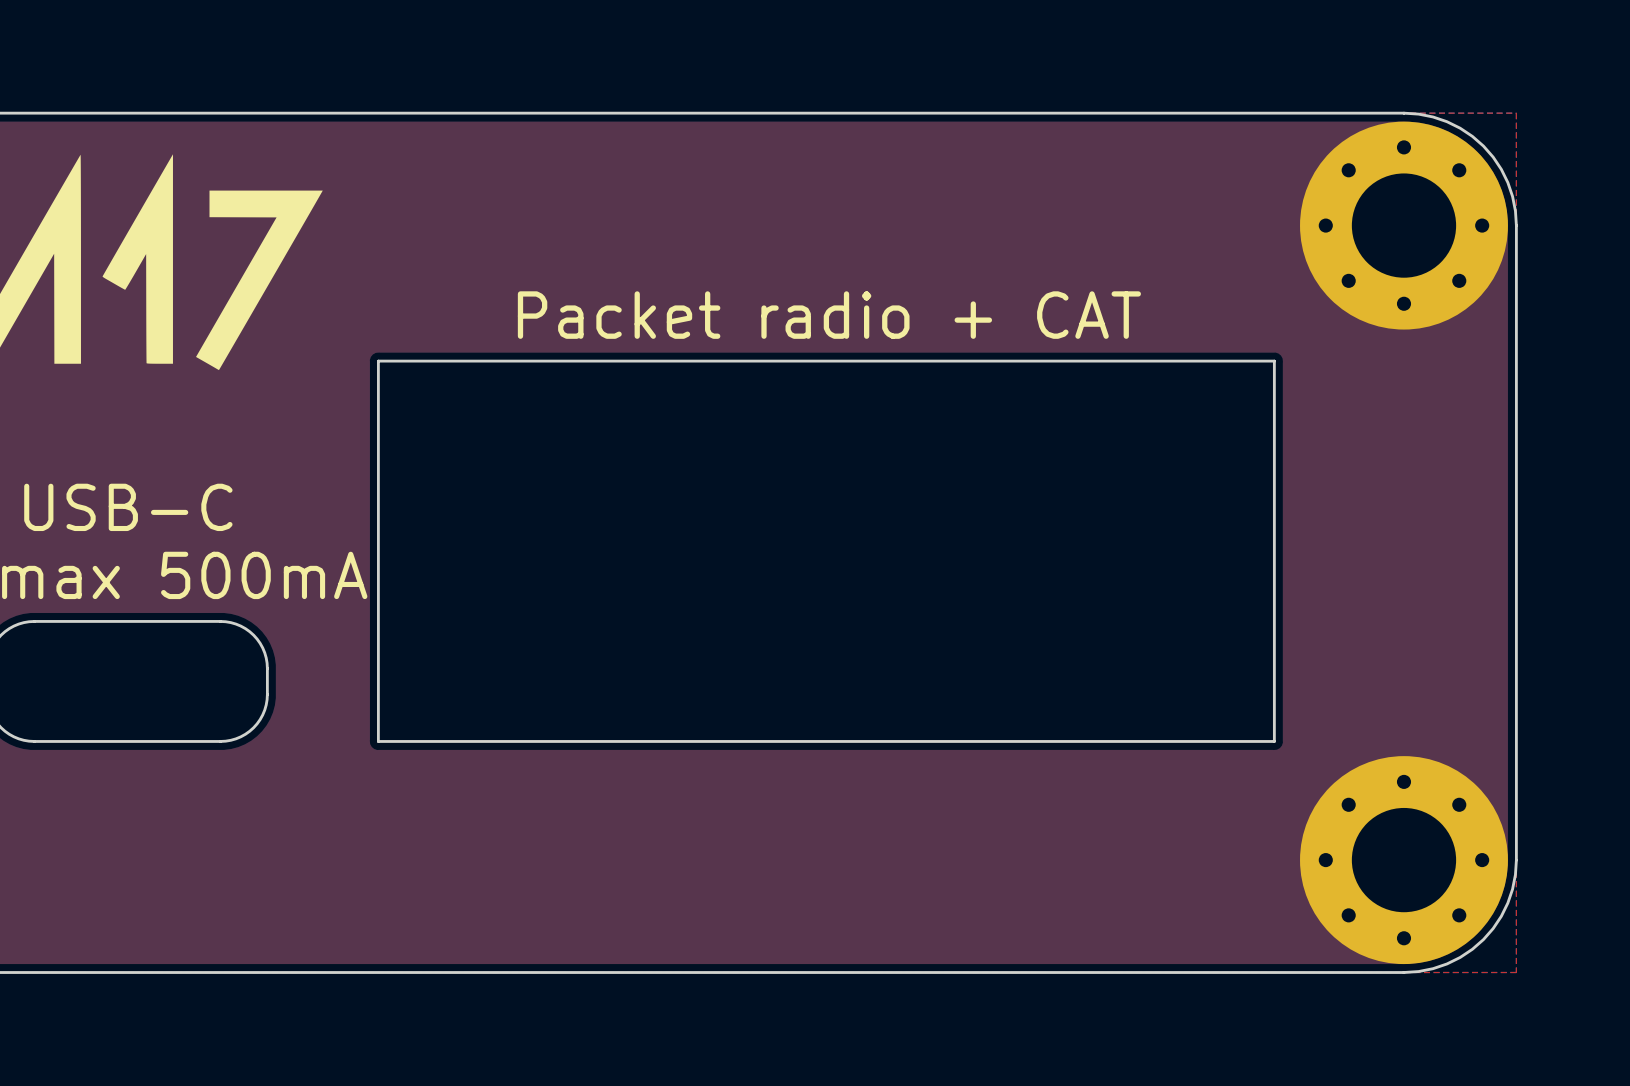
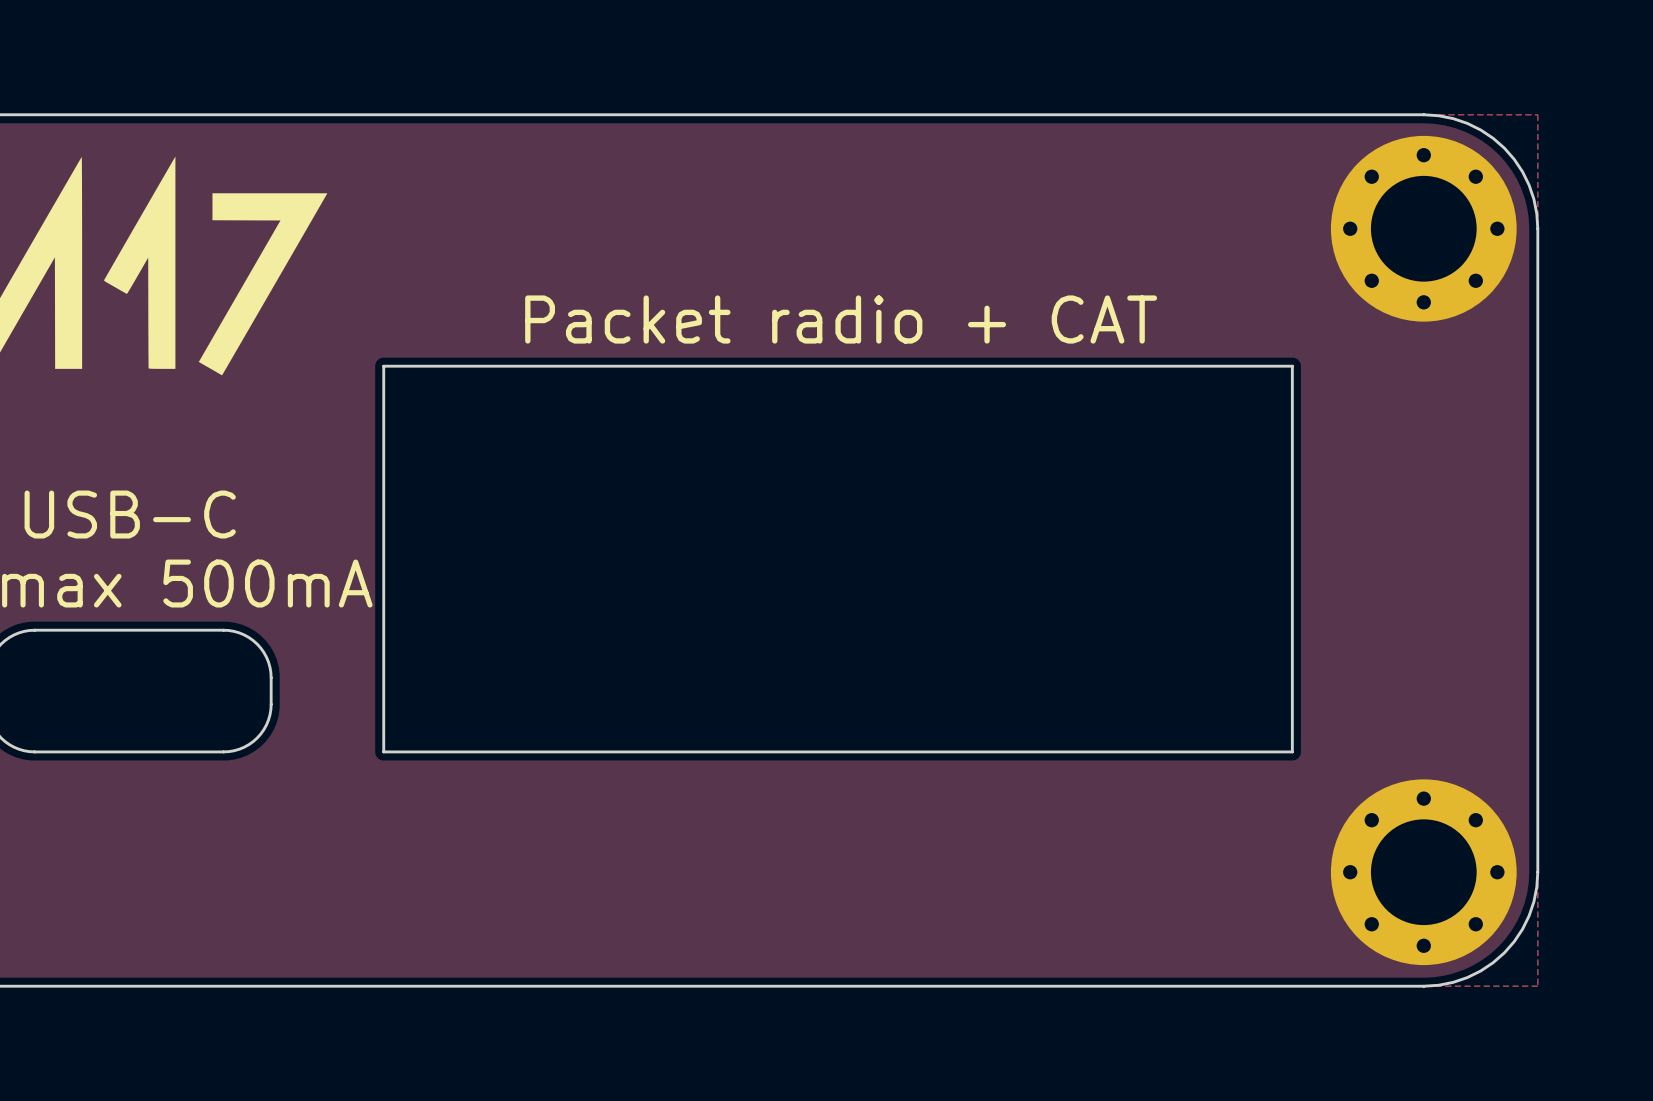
part footprint: [1300, 121, 1508, 330] -> [1330, 135, 1517, 322]
part footprint: [1300, 756, 1508, 965] -> [1330, 779, 1517, 966]

